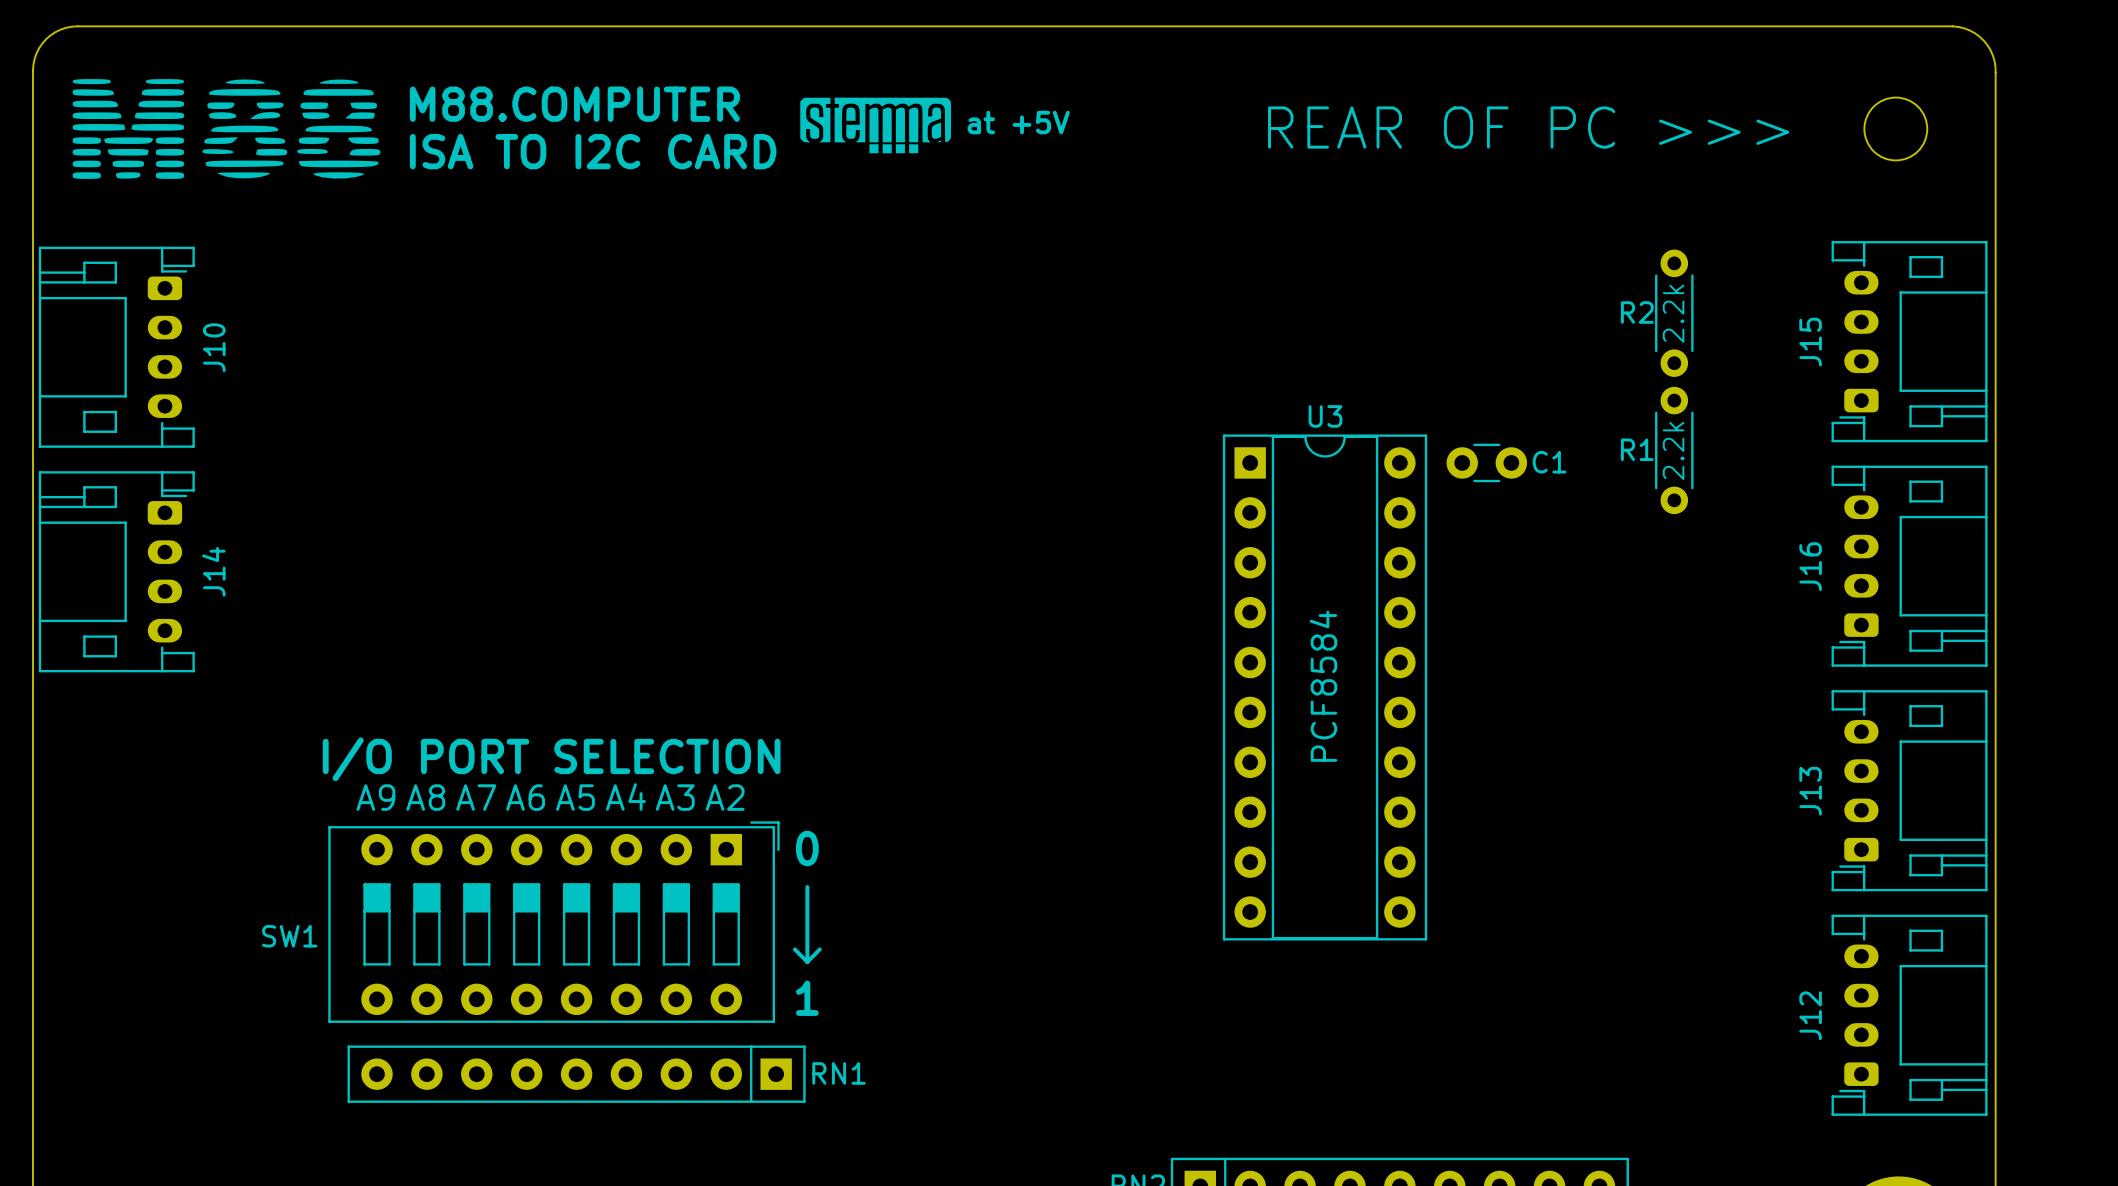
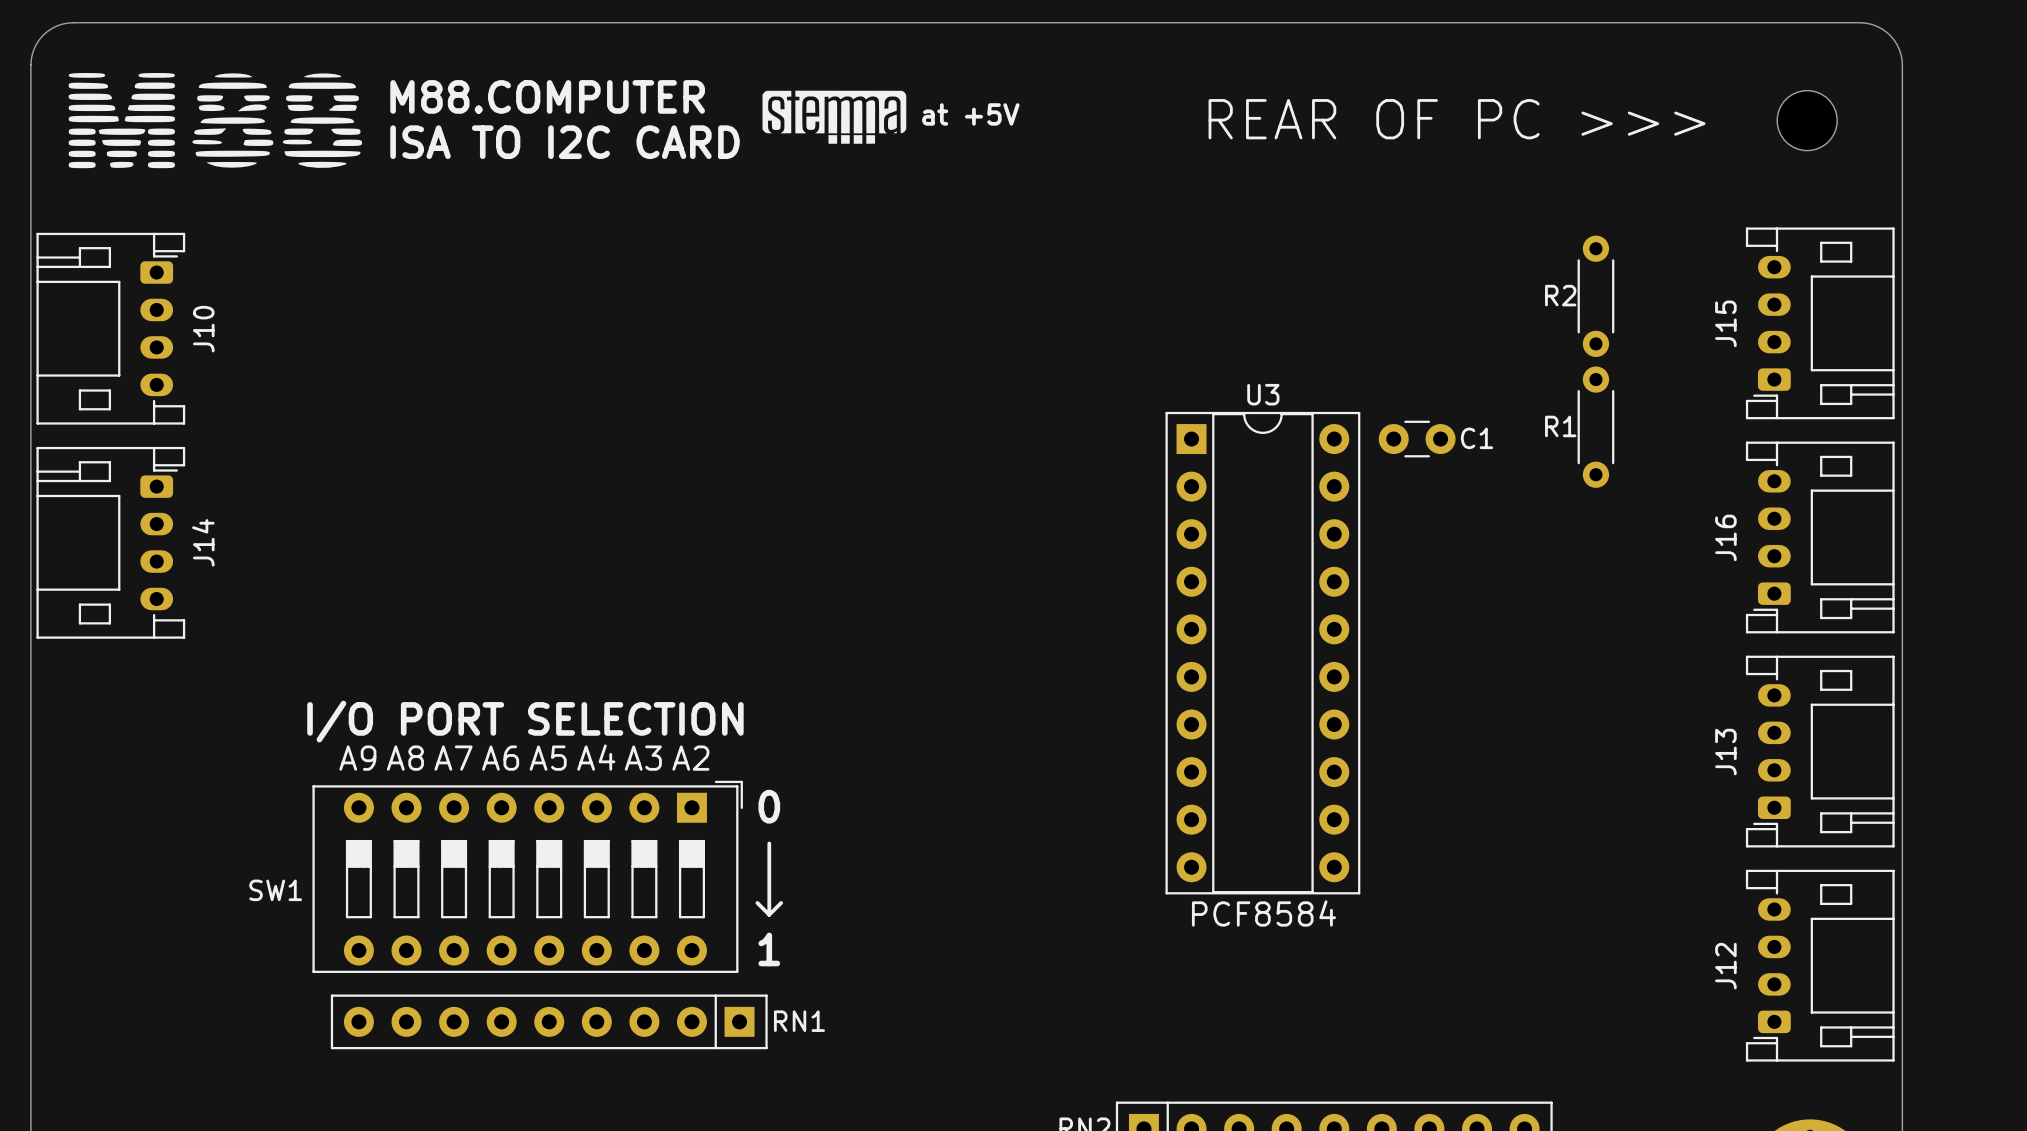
text: 2.2k (1673, 313) -> none
text: 2.2k (1673, 450) -> none
text rotation: 0° (1323, 686) -> 90° clockwise (1263, 913)
text position: PCF8584 (1323, 686) -> PCF8584 (1263, 913)

